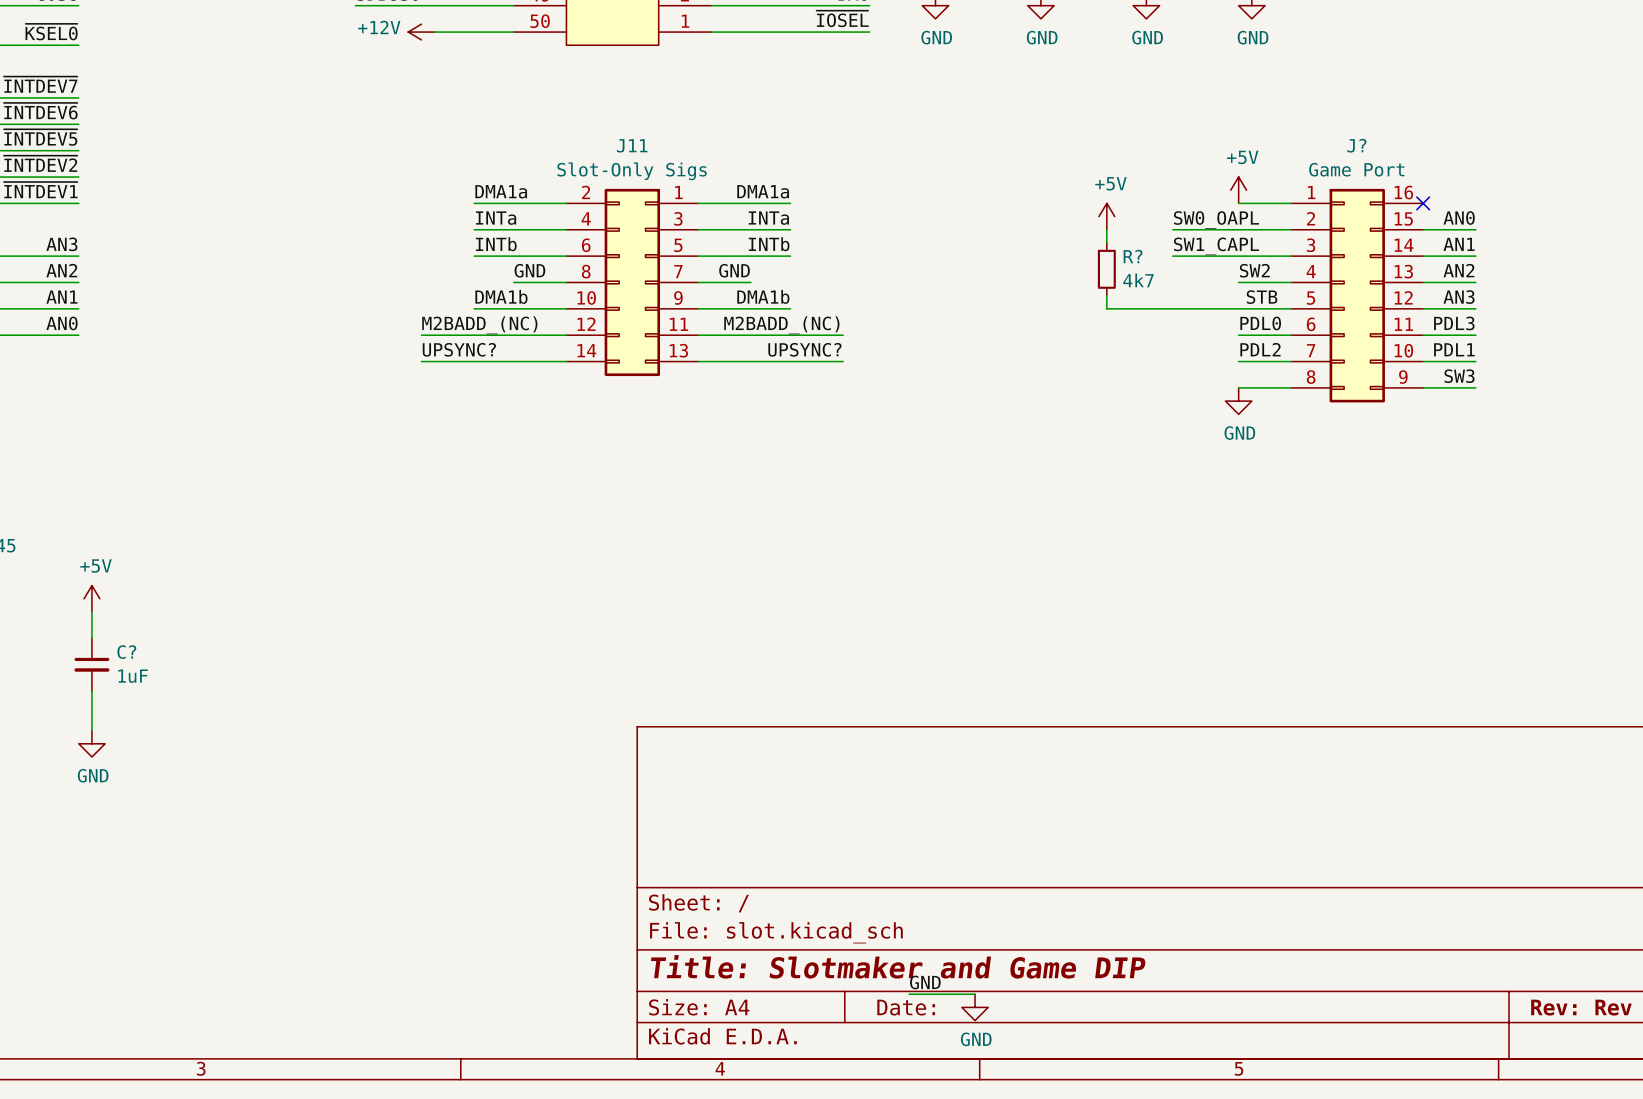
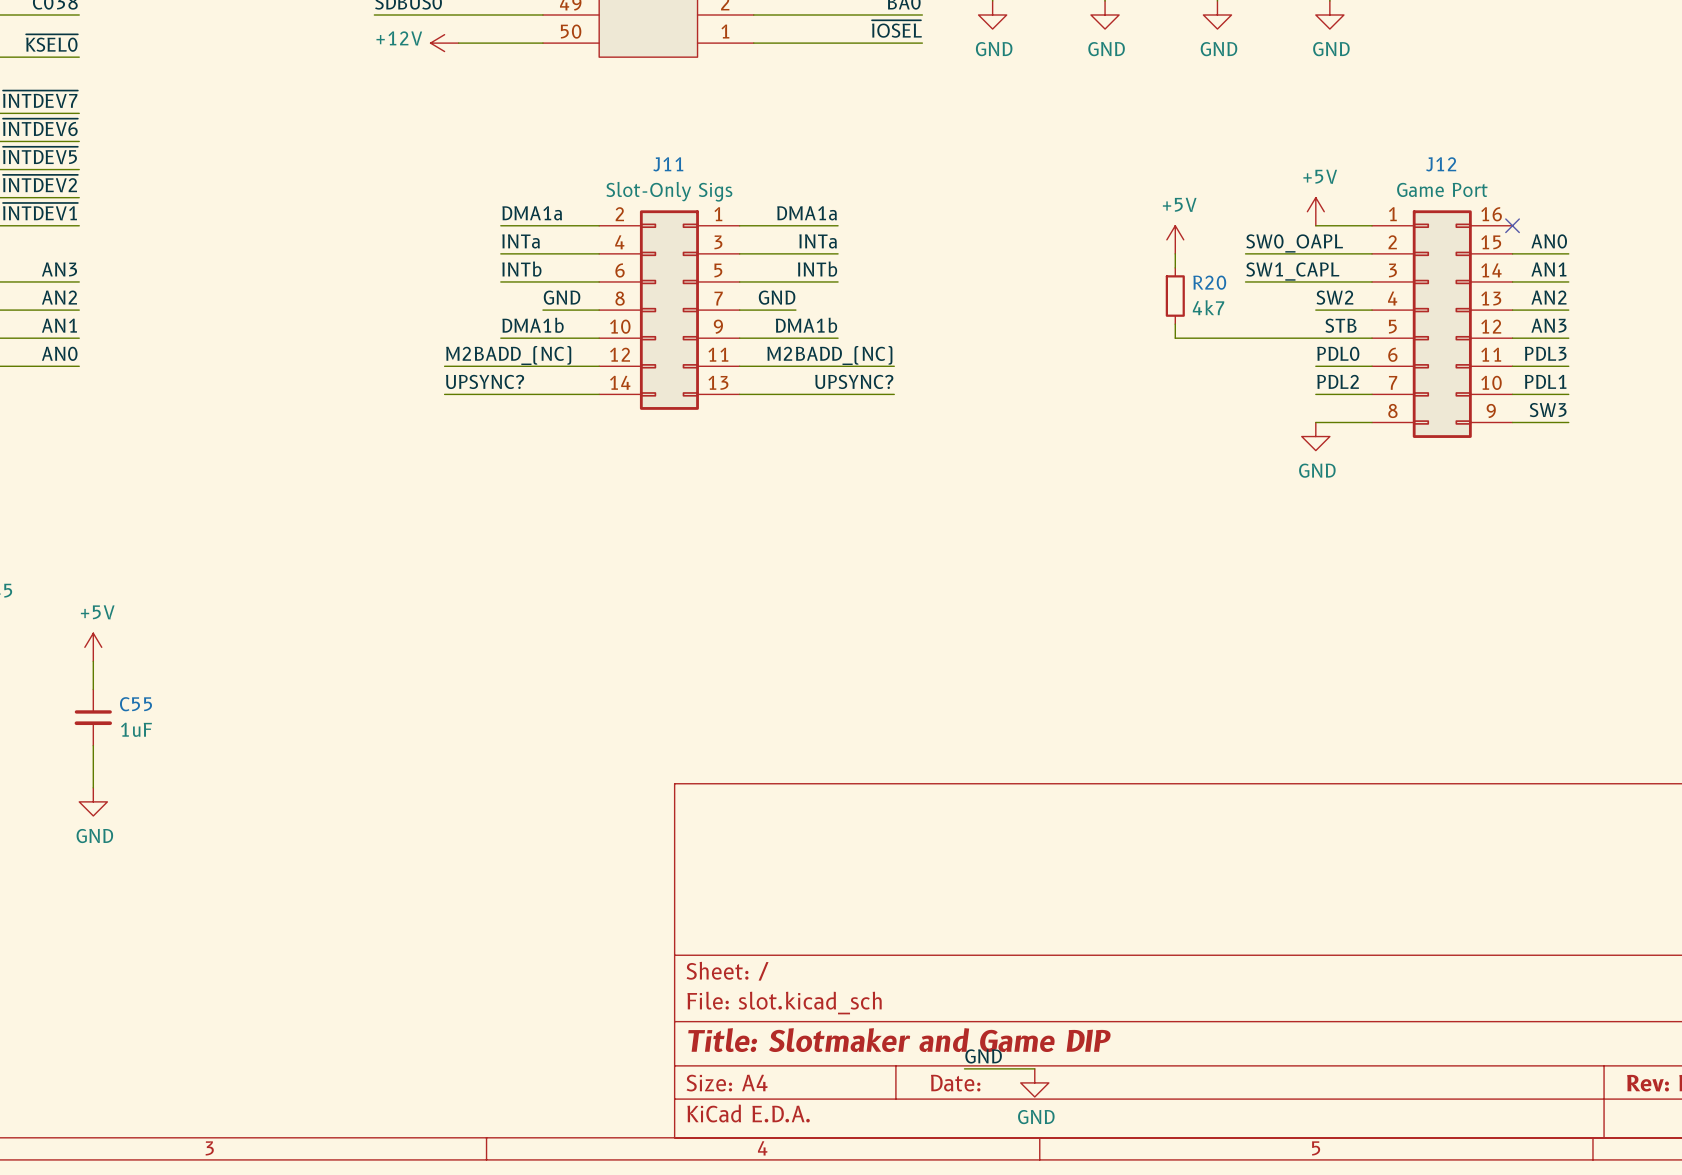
J? name: J? (1356, 145) -> J12 (1441, 164)
R? name: R? (1133, 256) -> R20 (1209, 282)
C? name: C? (126, 652) -> C55 (135, 704)

